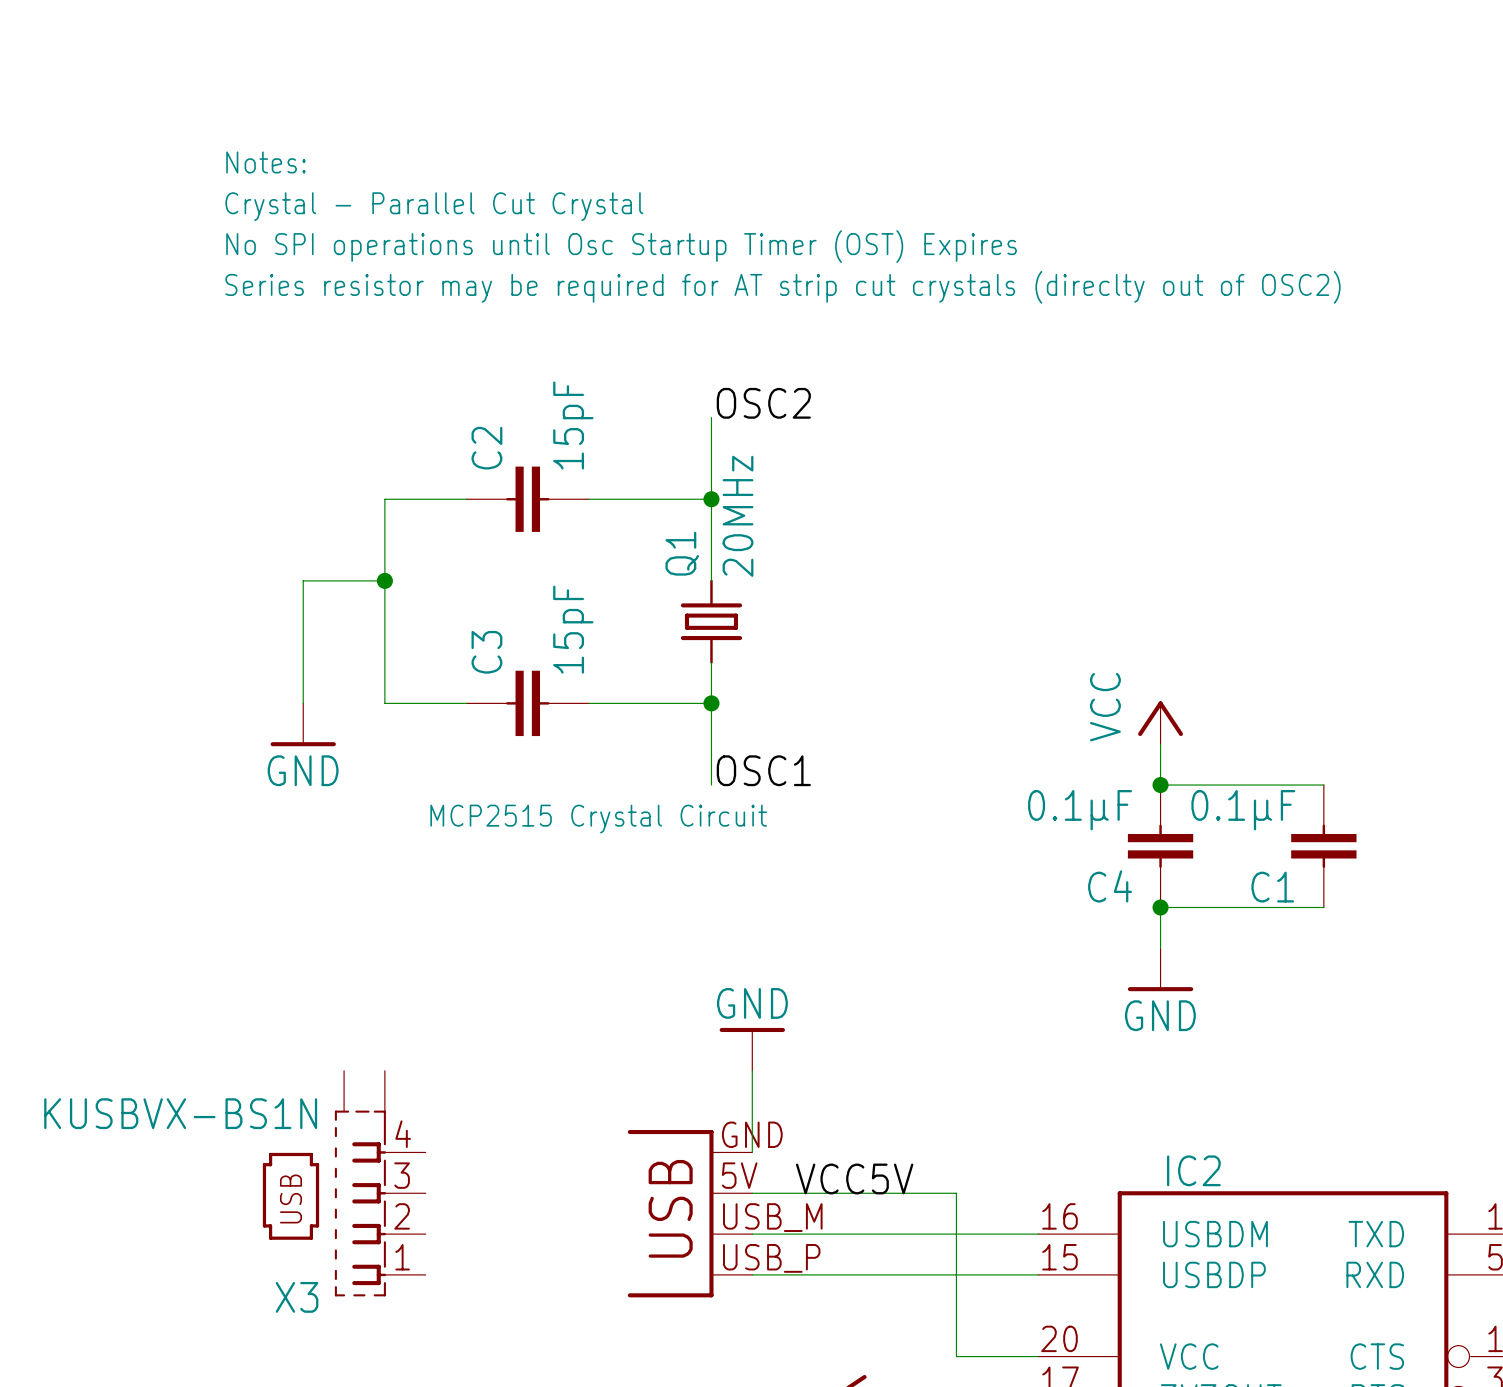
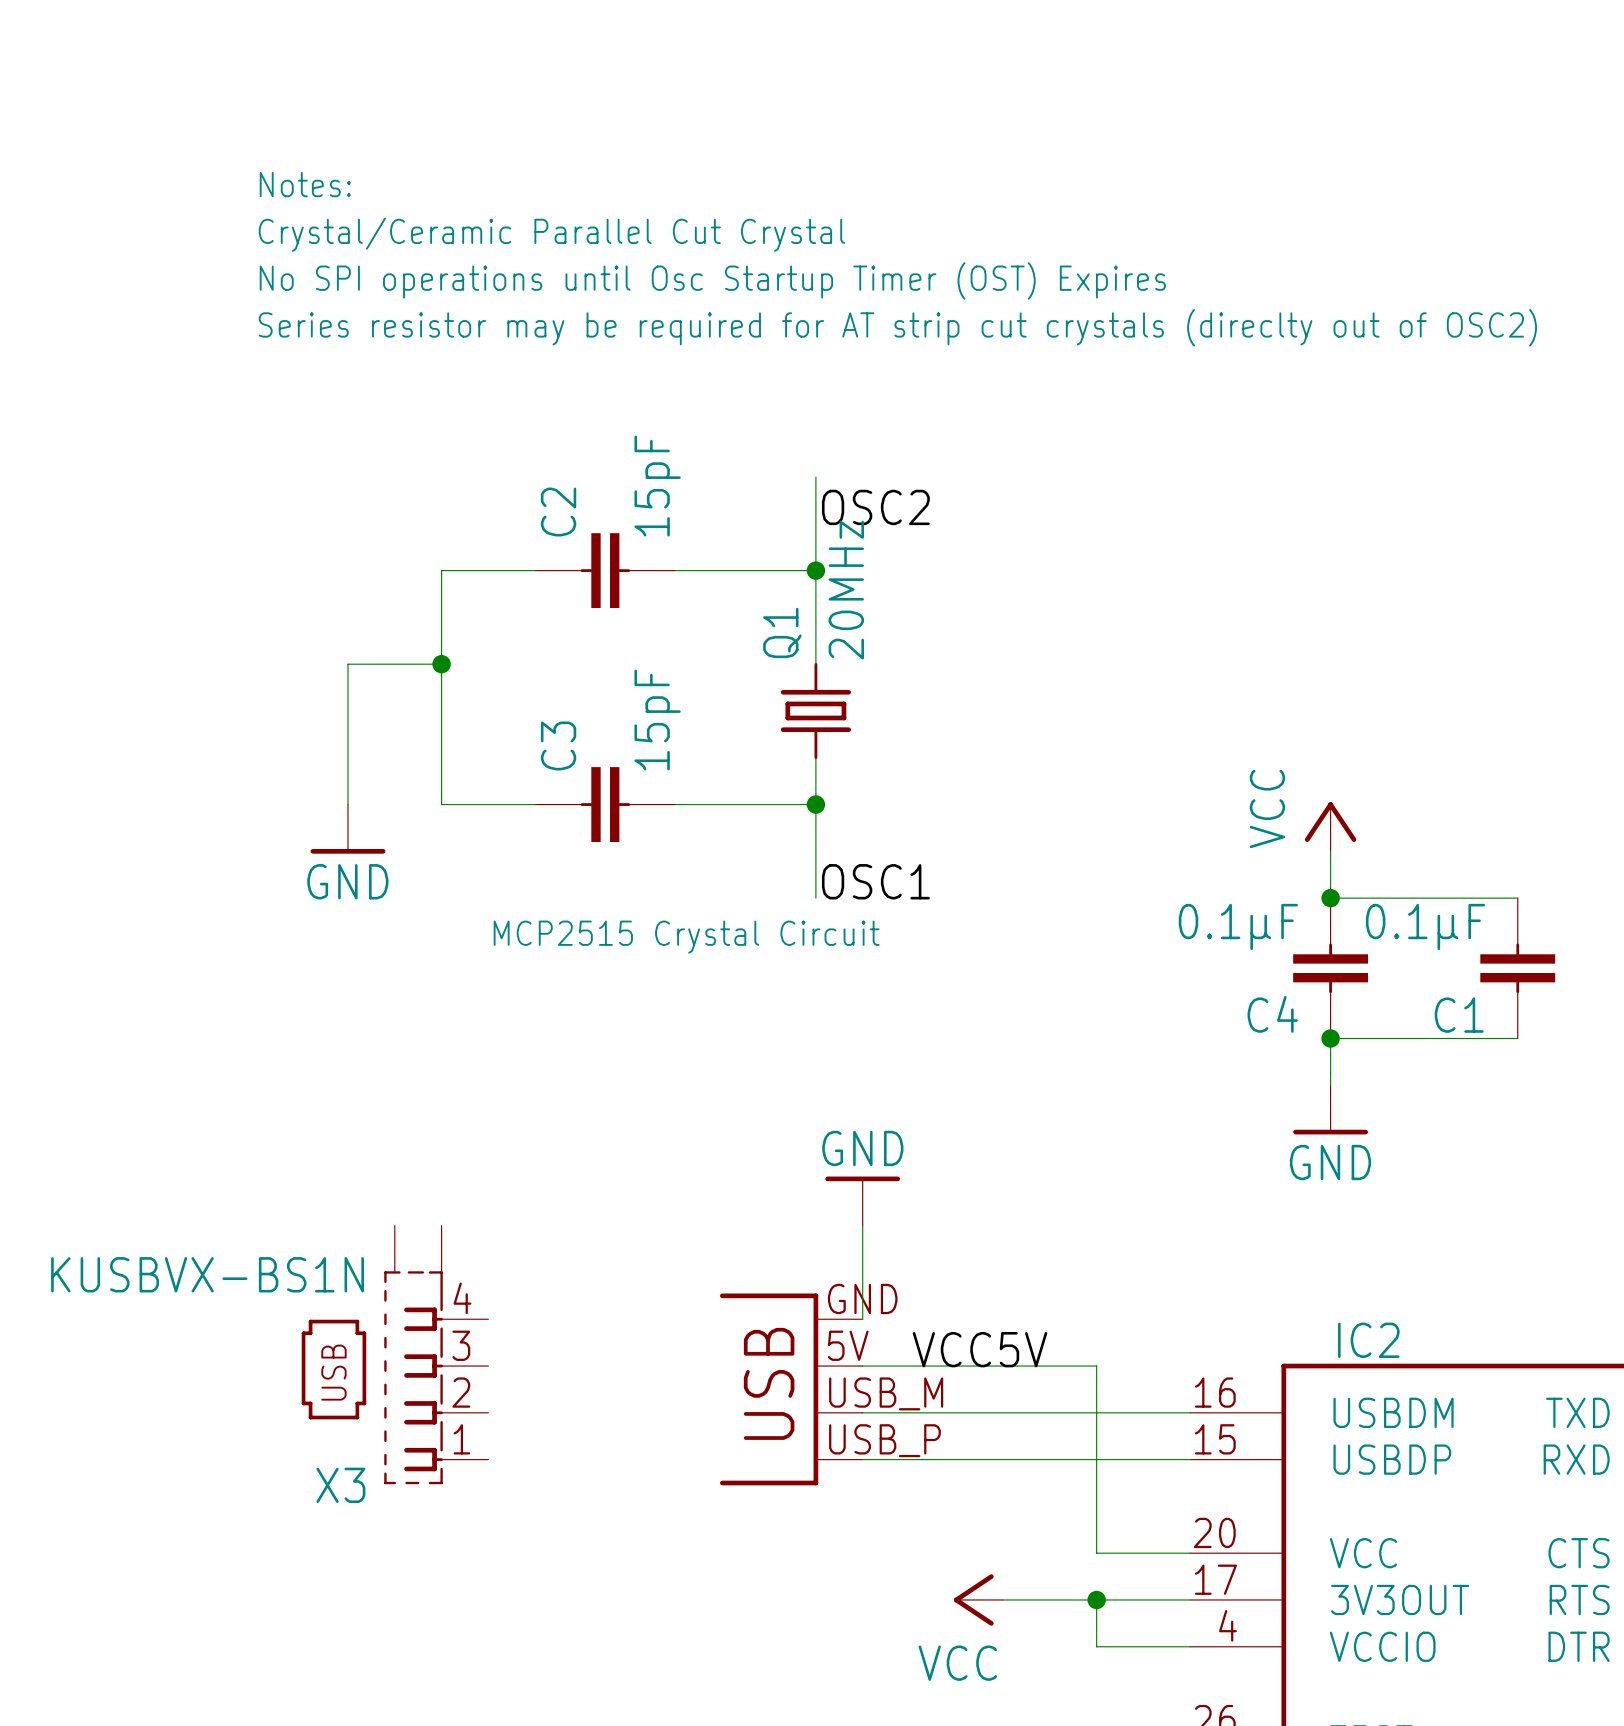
text: Crystal - Parallel Cut Crystal (434, 206) -> Crystal/Ceramic Parallel Cut Crystal (551, 234)
label position: OSC2 (763, 403) -> OSC2 (875, 507)

